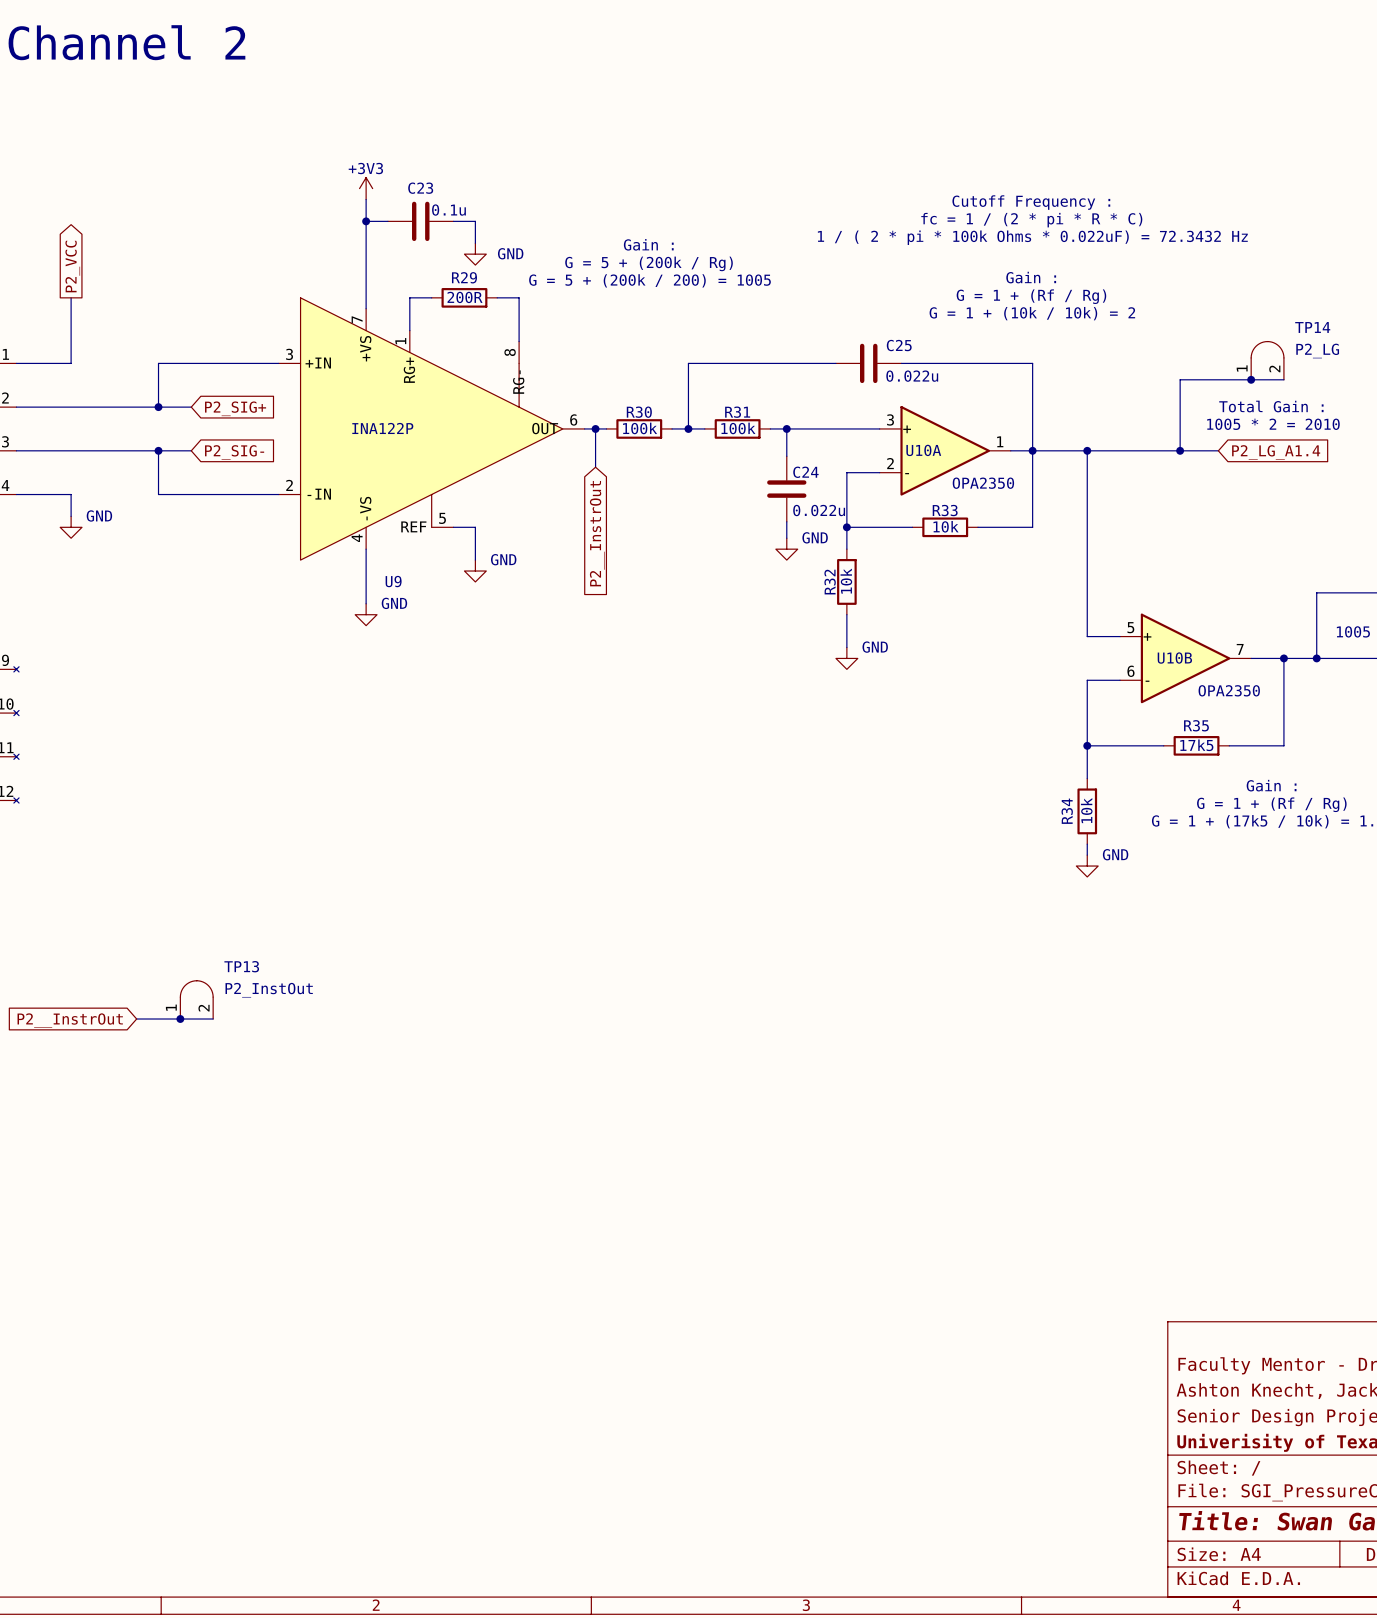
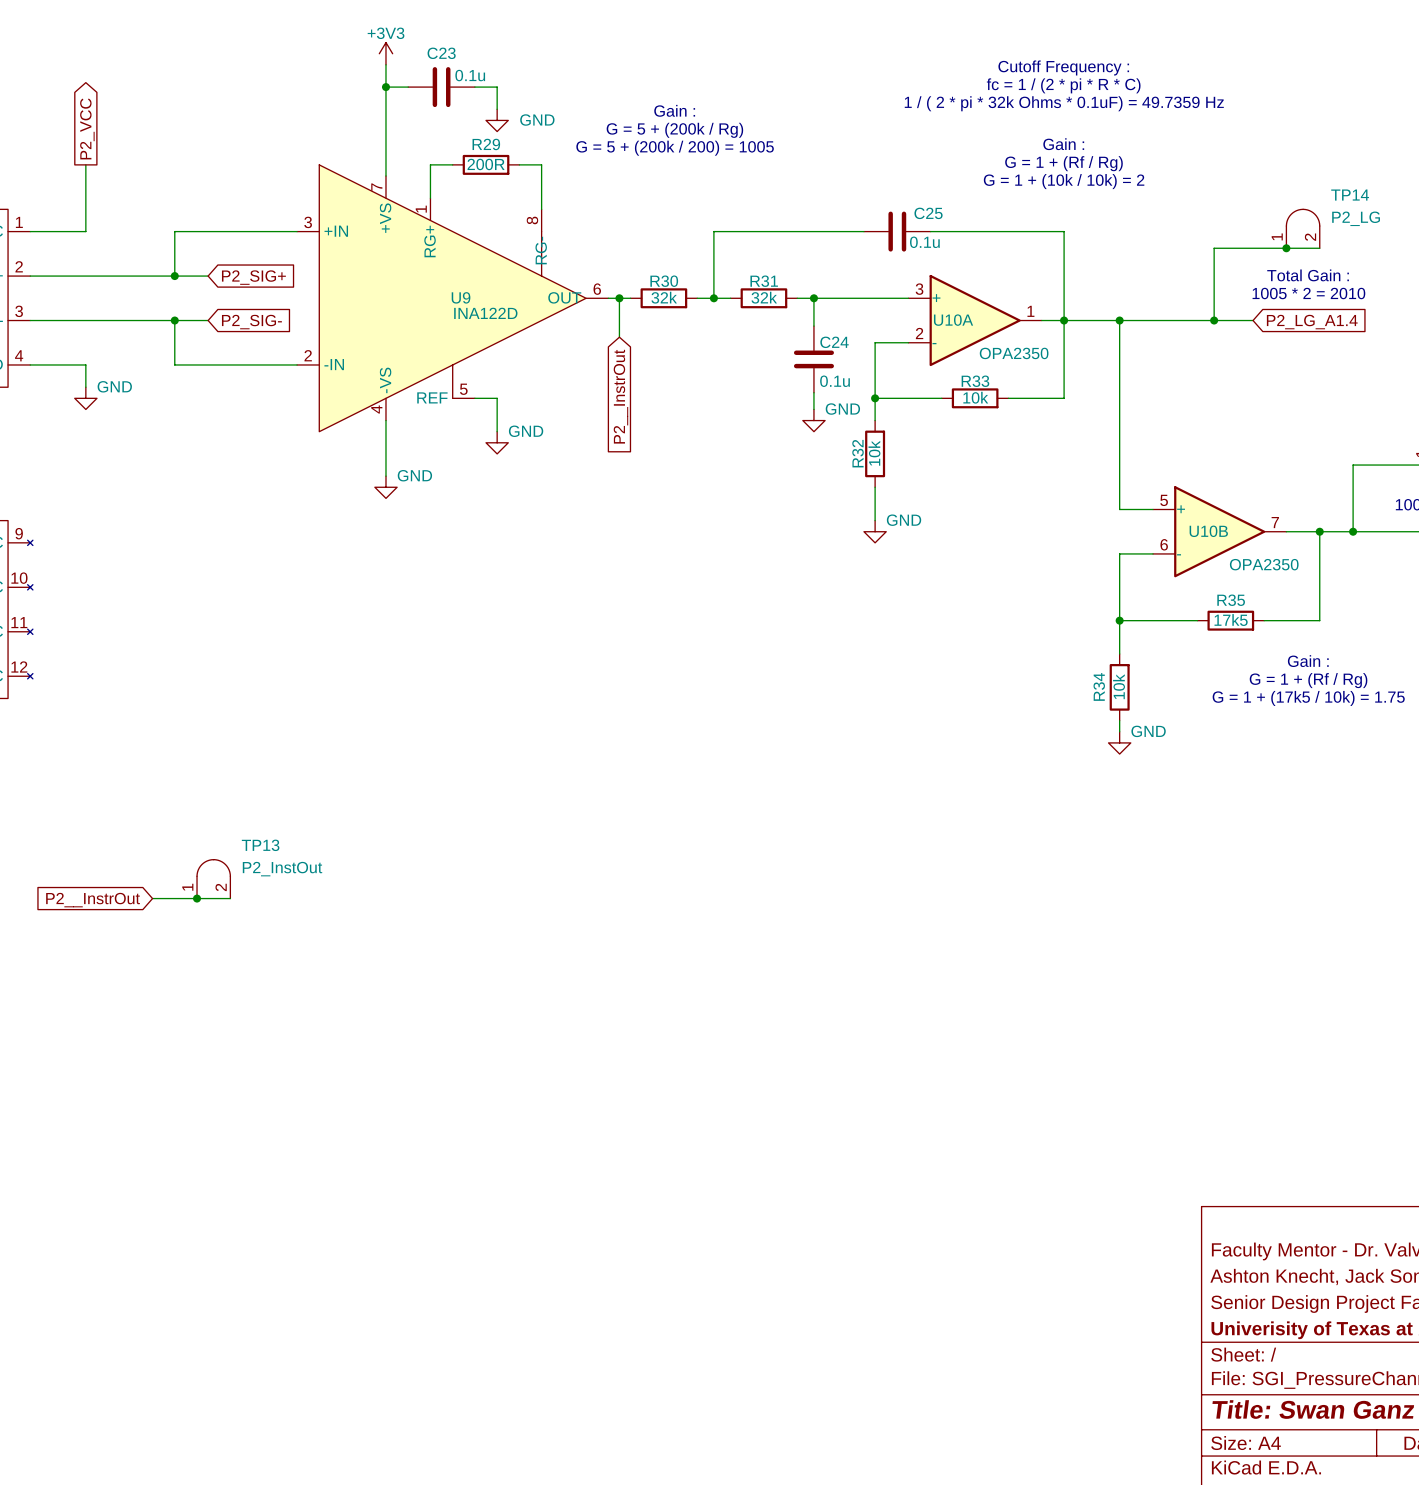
text: 1 / ( 2 * pi * 100k Ohms * 0.022uF) = 72.3432 Hz (1032, 237) -> 1 / ( 2 * pi * 32k Ohms * 0.1uF) = 49.7359 Hz (1064, 103)
C25 value: 0.022u (912, 376) -> 0.1u (924, 242)
U9 value: INA122P (382, 428) -> INA122D (485, 313)
R30 value: 100k (640, 428) -> 32k (664, 297)
R31 value: 100k (738, 428) -> 32k (764, 297)
C24 value: 0.022u (819, 510) -> 0.1u (835, 381)
U9 name position: U9 (393, 581) -> U9 (461, 297)

